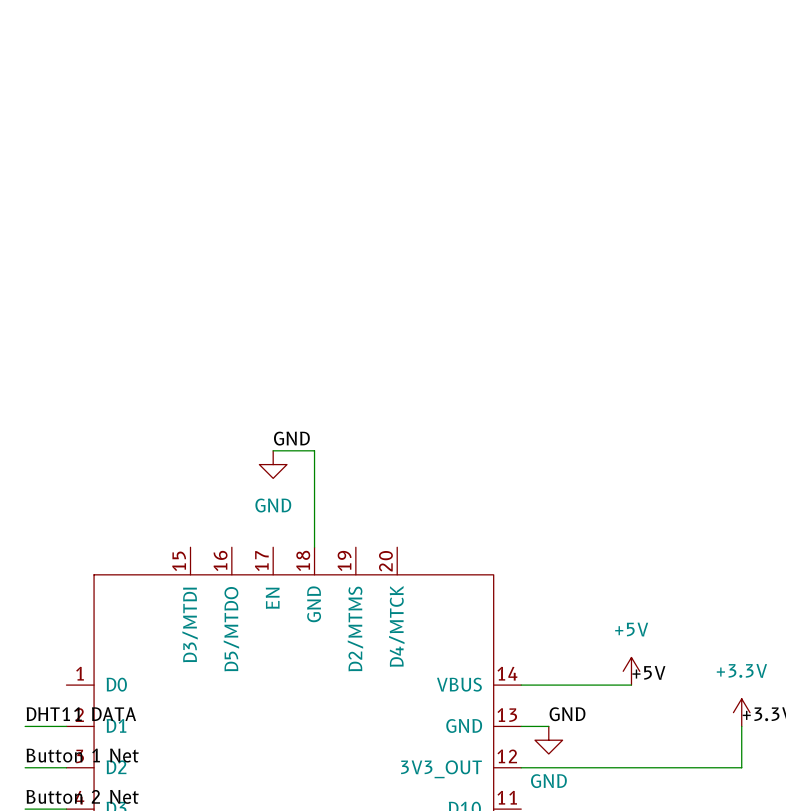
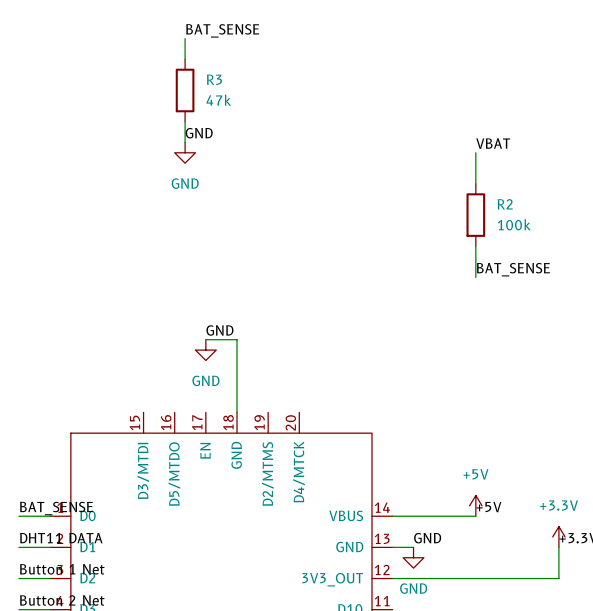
label: none -> BAT_SENSE (222, 30)
wire: none -> (185, 38) (185, 59)
R3: none -> 47k (185, 90)
wire: none -> (185, 121) (185, 142)
label: none -> GND (199, 133)
label: none -> VBAT (493, 143)
power symbol: none -> GND (185, 152)
wire: none -> (475, 152) (475, 183)
R2: none -> 100k (475, 215)
wire: none -> (475, 246) (475, 277)
label: none -> BAT_SENSE (513, 269)
label: none -> BAT_SENSE (56, 508)
wire: none -> (18, 516) (50, 516)

